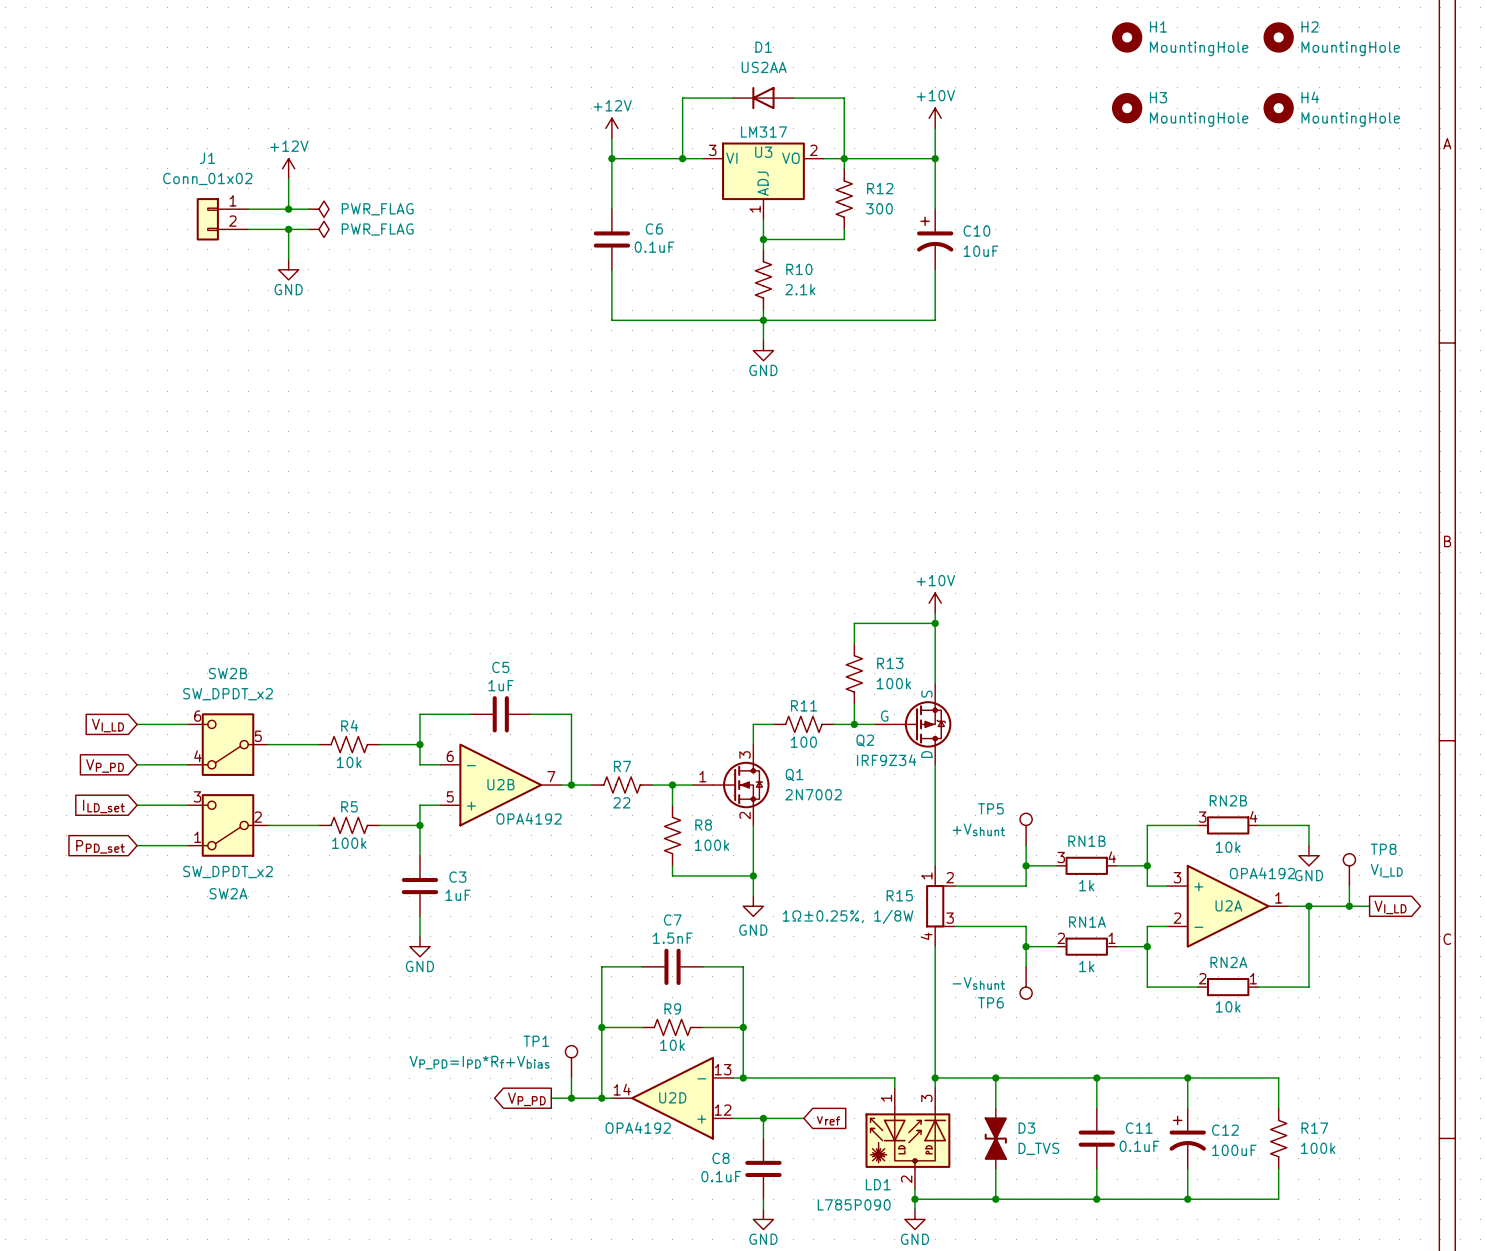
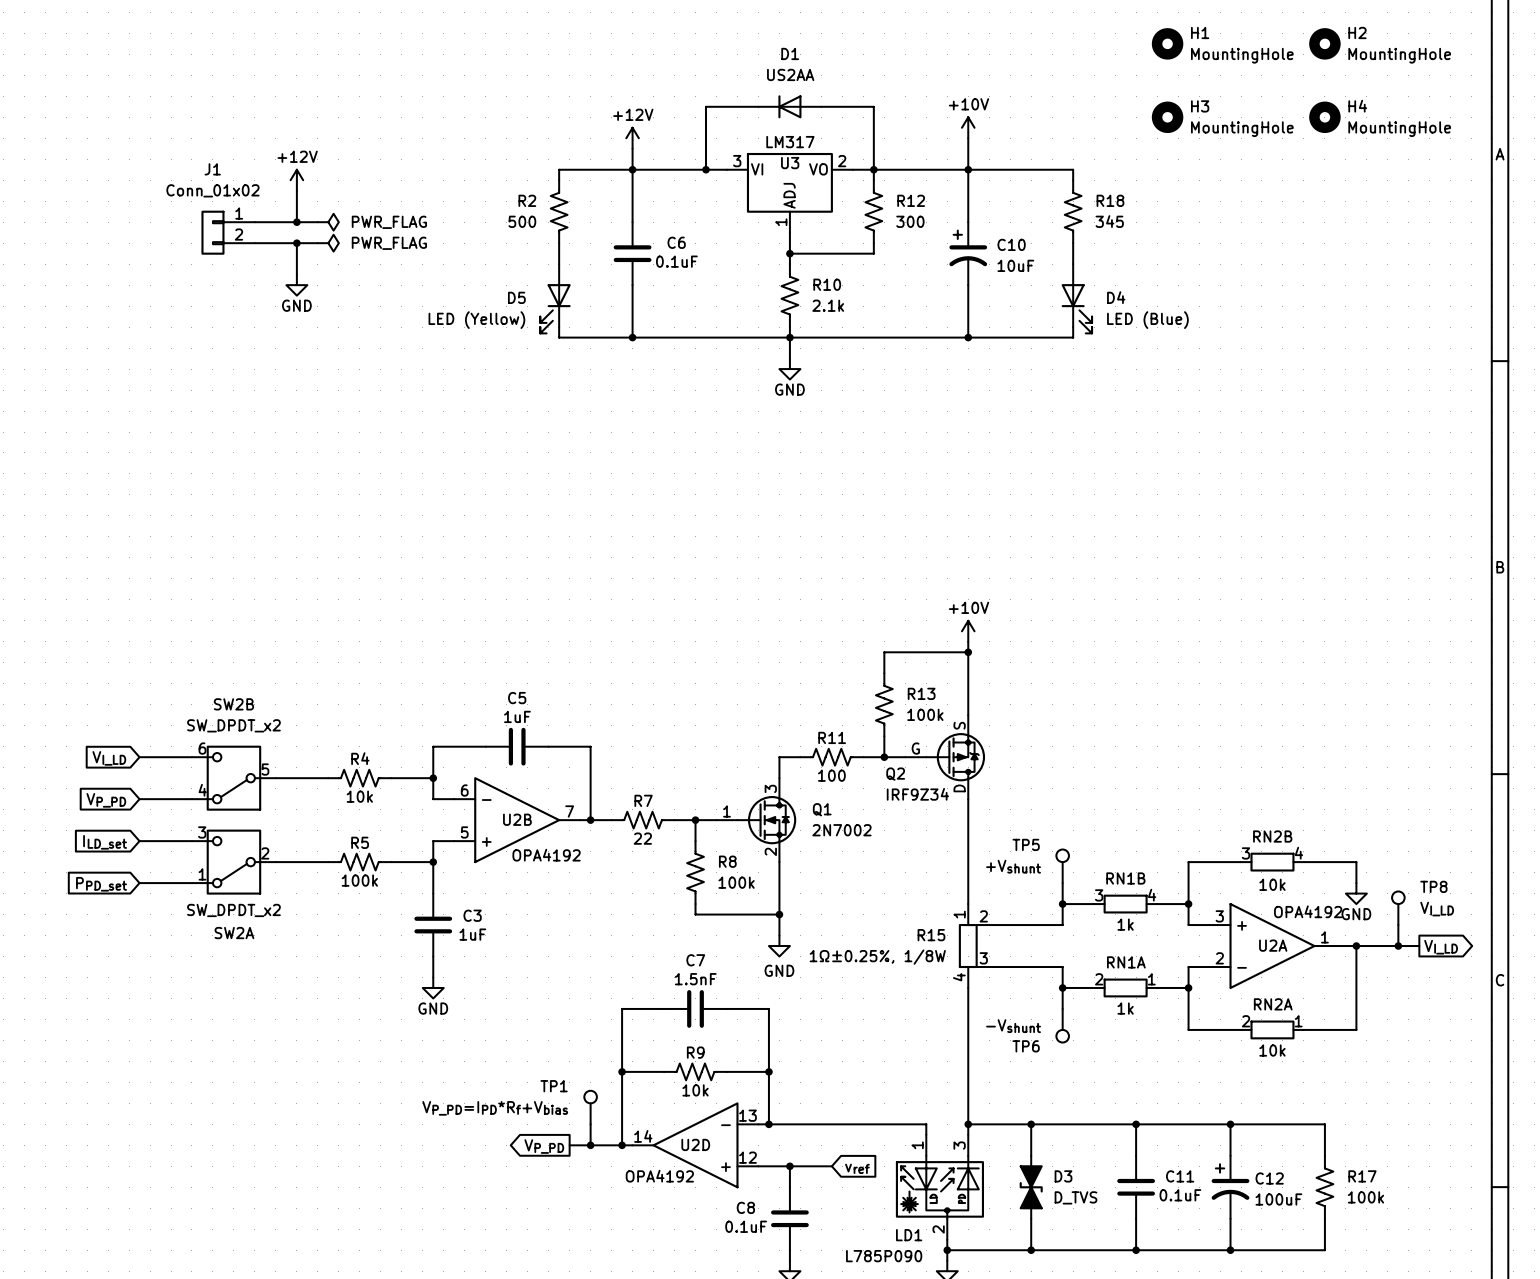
wire: none -> (632, 169) (559, 169) (559, 180)
wire: none -> (968, 169) (1073, 169) (1073, 180)
R2: none -> 500 (559, 211)
R18: none -> 345 (1073, 211)
wire: none -> (559, 243) (559, 264)
wire: none -> (1073, 243) (1073, 264)
D5: none -> LED (Yellow) (555, 298)
D4: none -> LED (Blue) (1076, 298)
wire: none -> (559, 327) (559, 337) (632, 337)
wire: none -> (1073, 327) (1073, 337) (968, 337)
junction: none -> (632, 337)
junction: none -> (968, 337)

